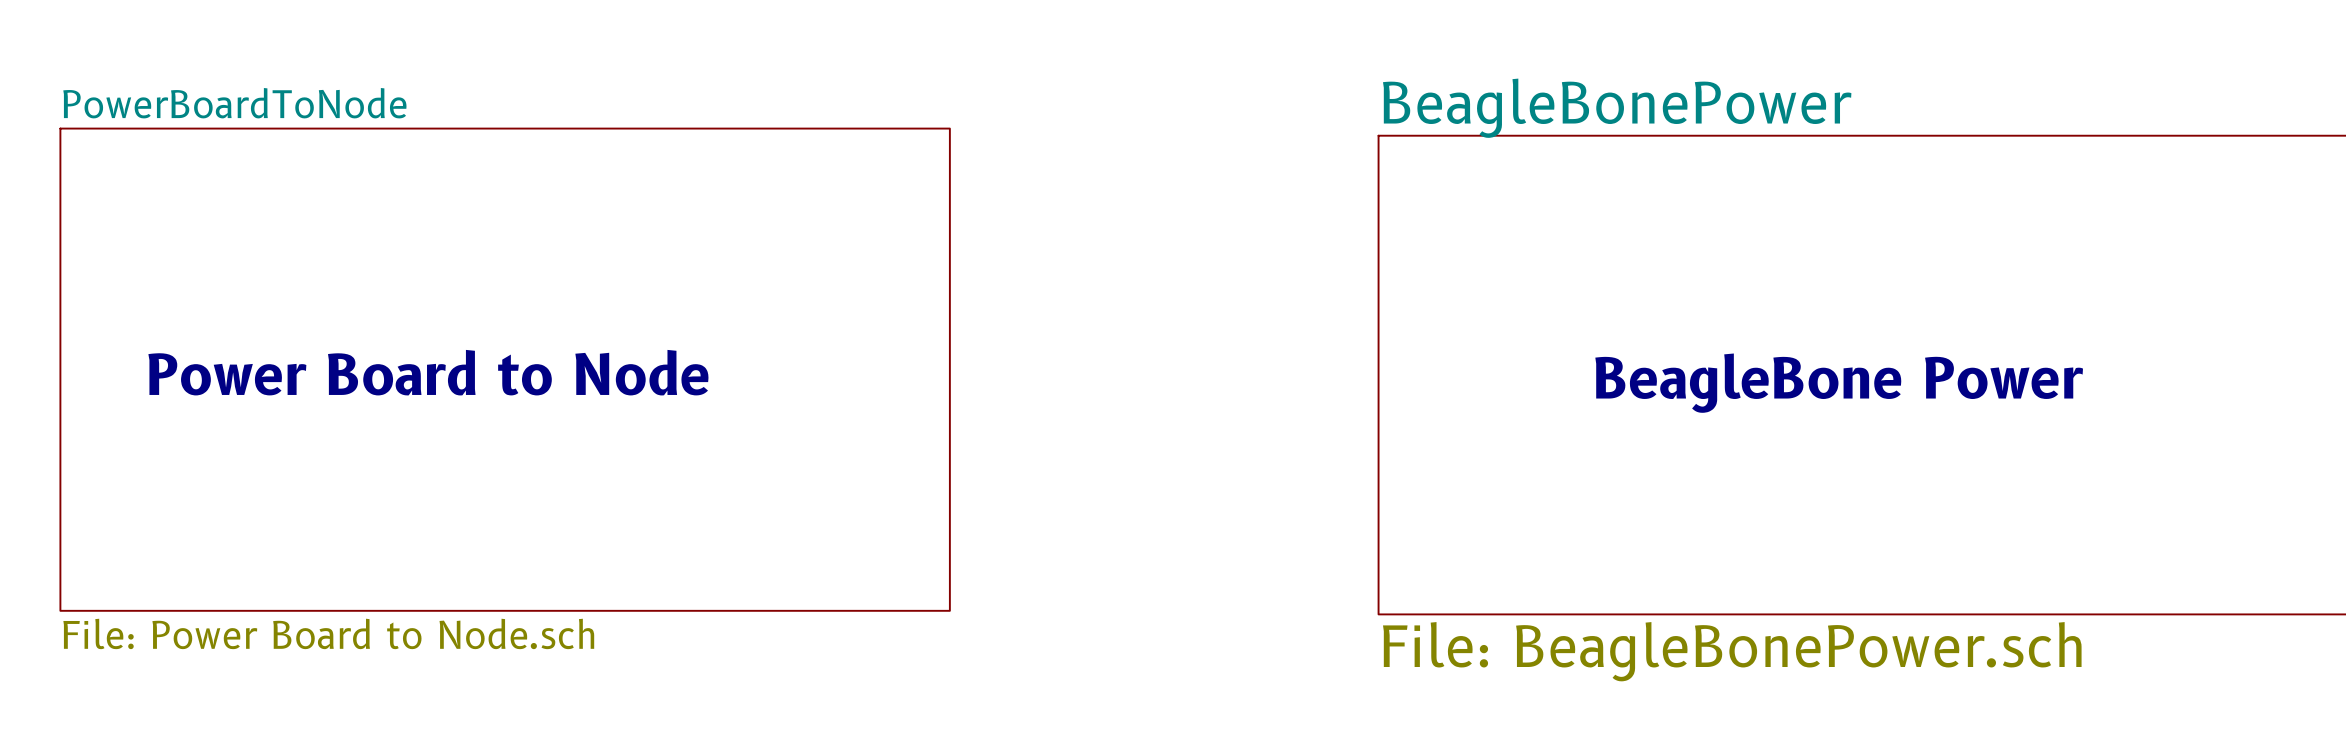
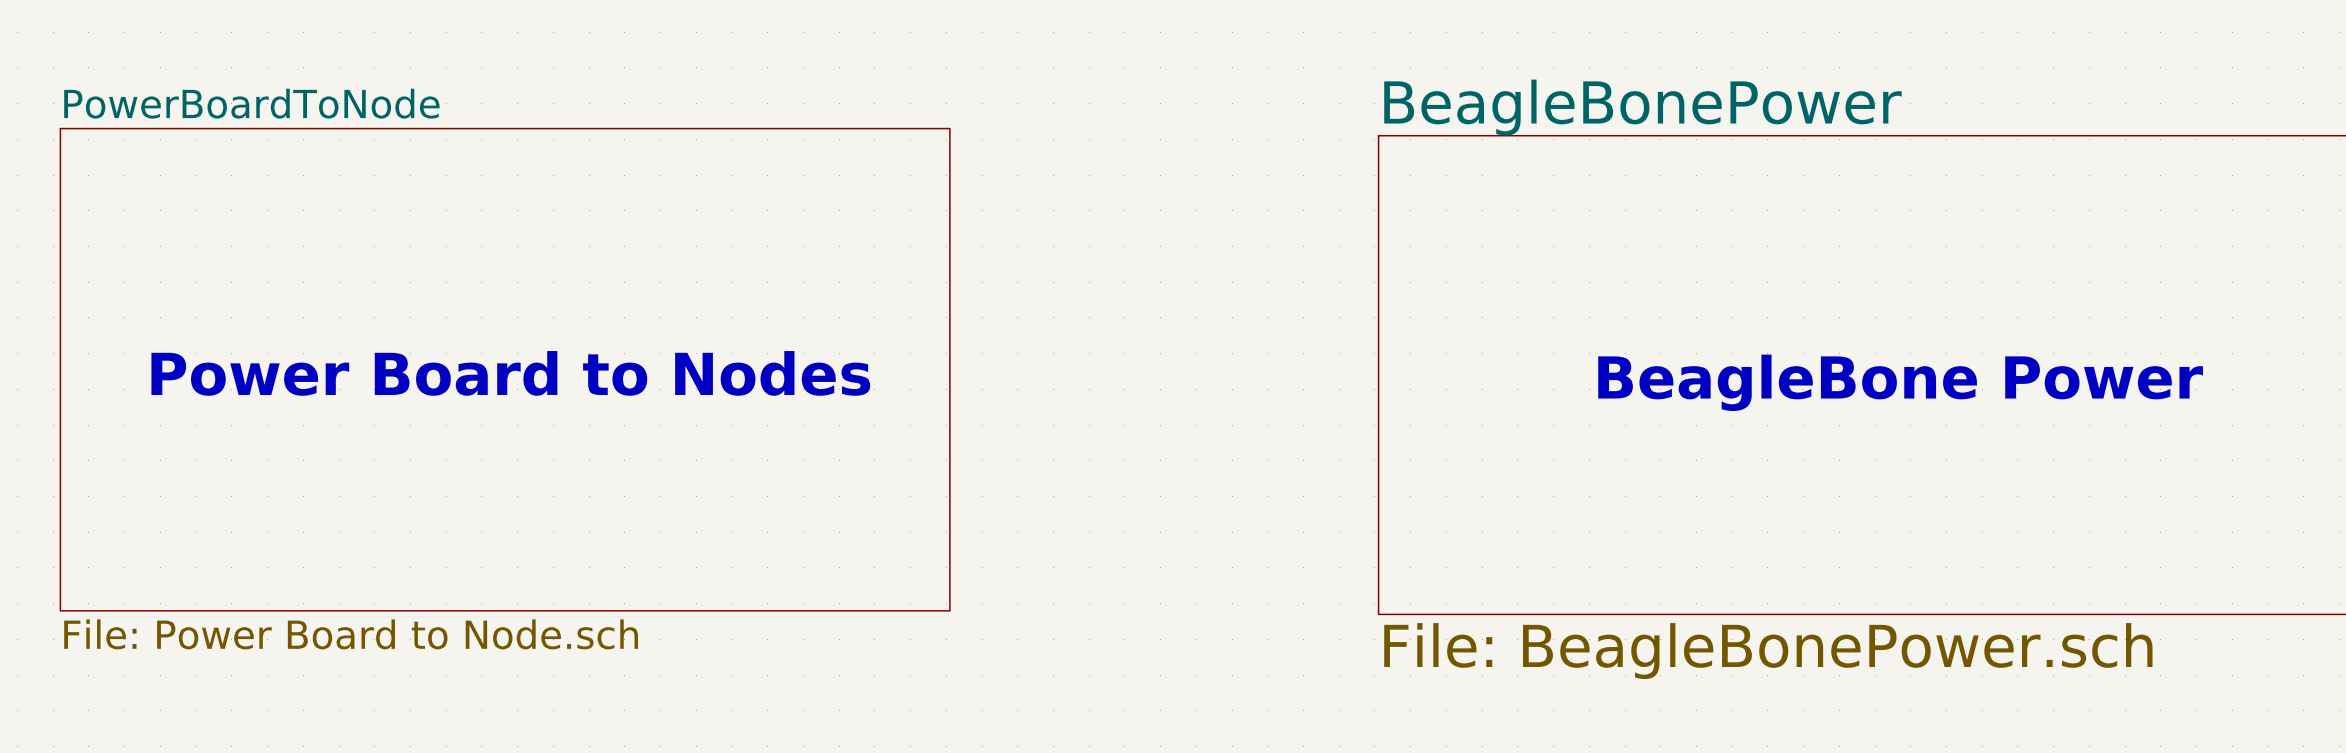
text: Power Board to Node (428, 372) -> Power Board to Nodes (510, 373)

